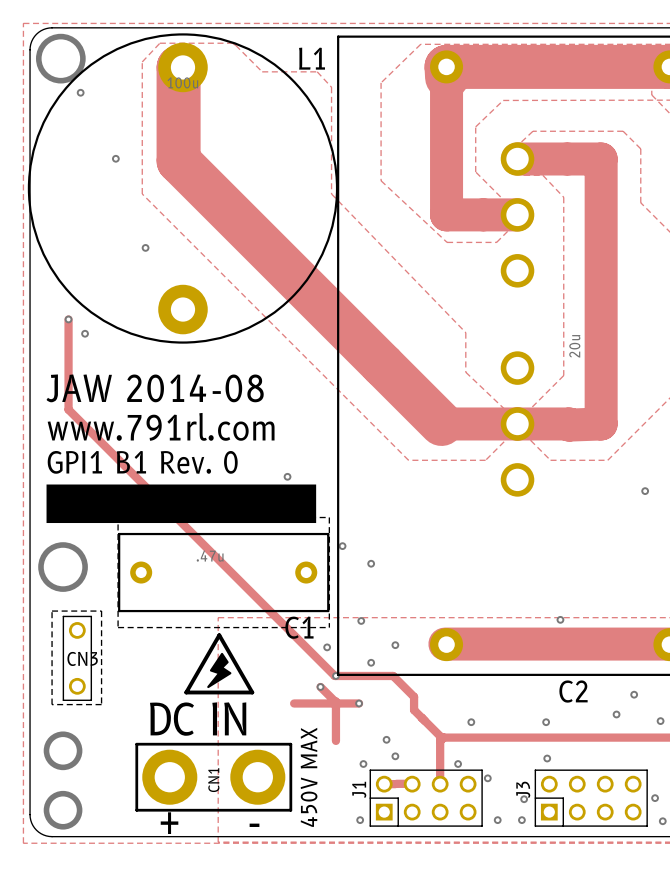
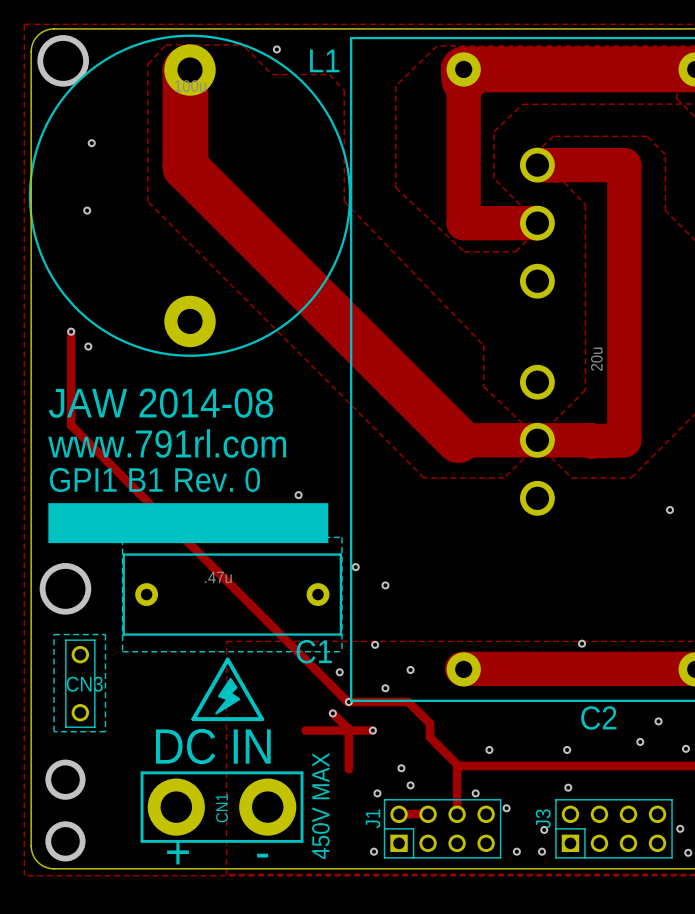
via: none -> (276, 49)
via: (80, 92) -> none
via: none -> (91, 143)
via: (115, 158) -> none
via: none -> (87, 210)
via: (145, 247) -> none

